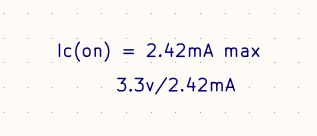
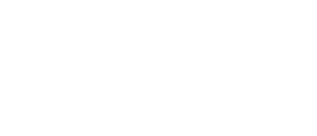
text: Ic(on) = 2.42mA max (159, 51) -> none
text: 3.3v/2.42mA (176, 85) -> none

